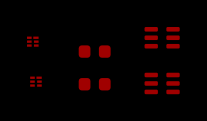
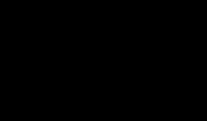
part: (162, 37) -> none
part: (32, 41) -> none
part: (94, 51) -> none
part: (35, 81) -> none
part: (162, 83) -> none
part: (94, 84) -> none

